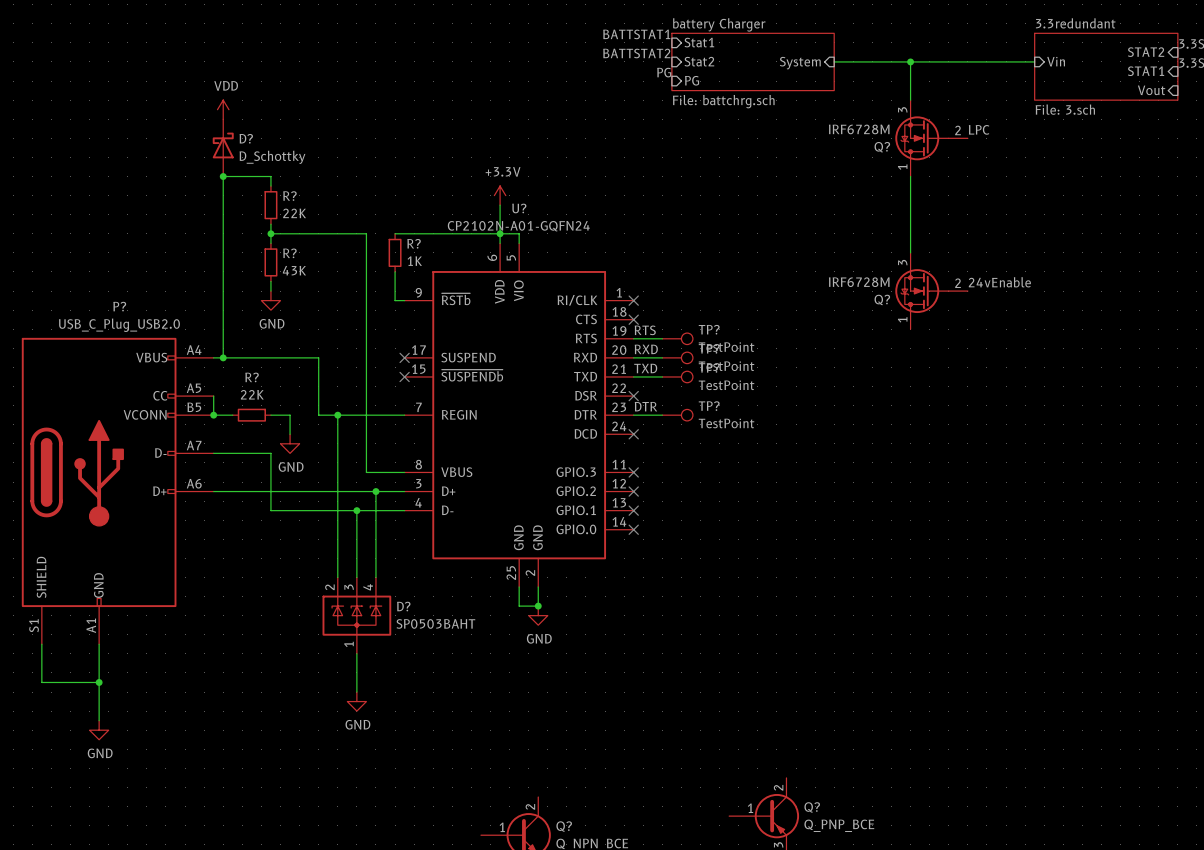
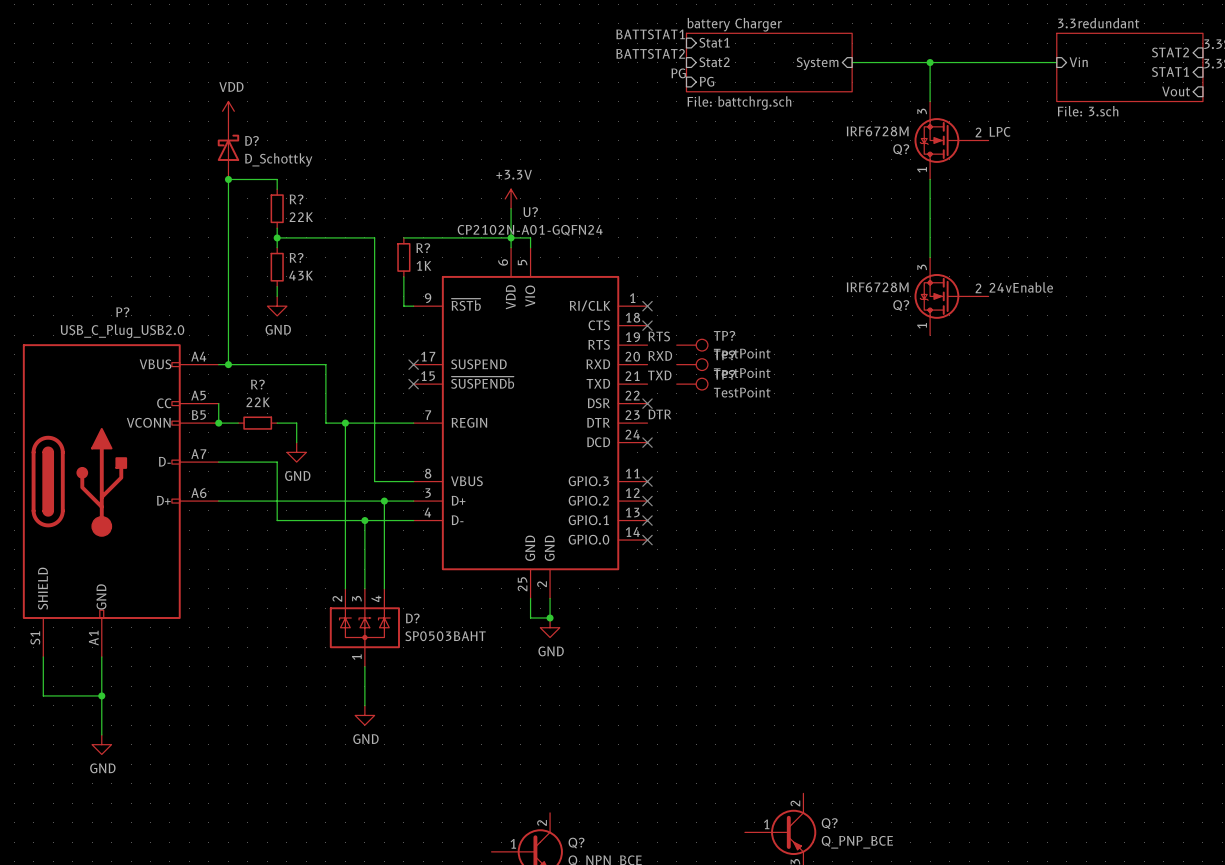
wire: (633, 338) (662, 338) -> none
wire: (633, 357) (662, 357) -> none
wire: (633, 376) (662, 376) -> none
wire: (633, 415) (662, 415) -> none
TP?: TestPoint (677, 415) -> none

